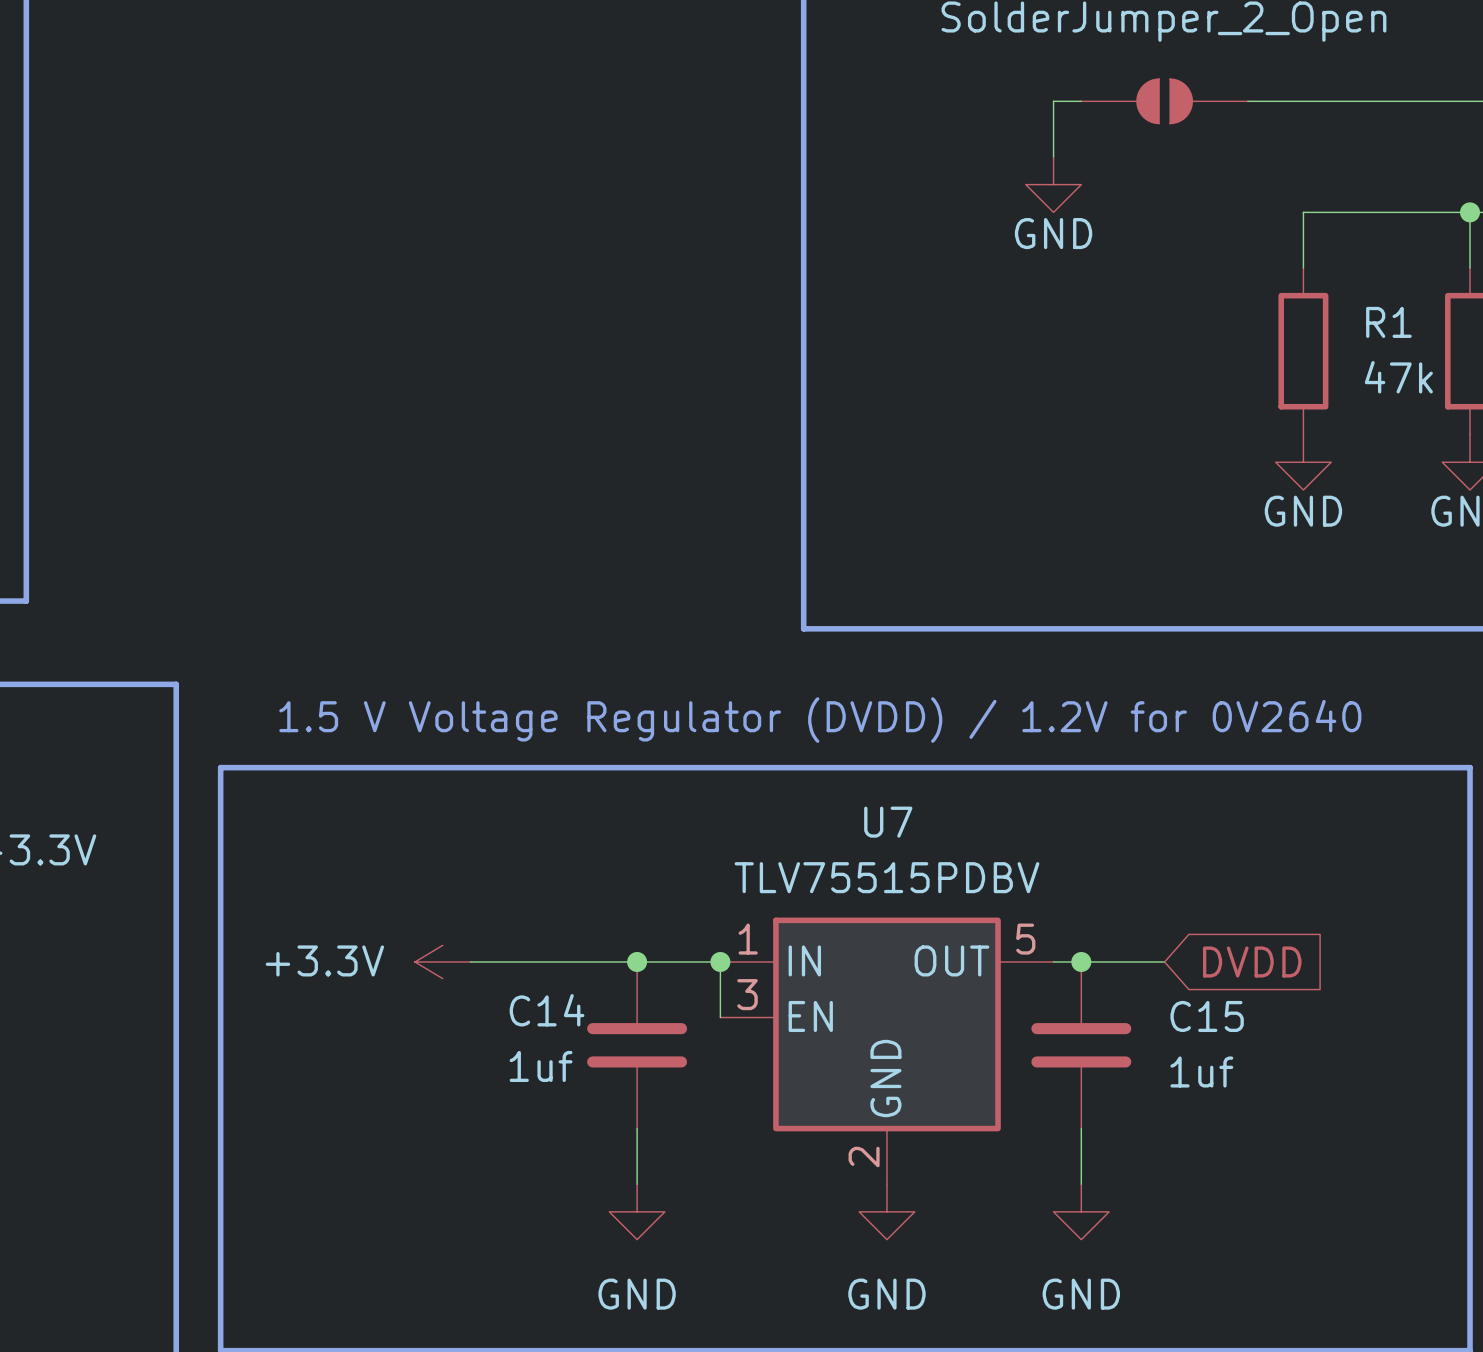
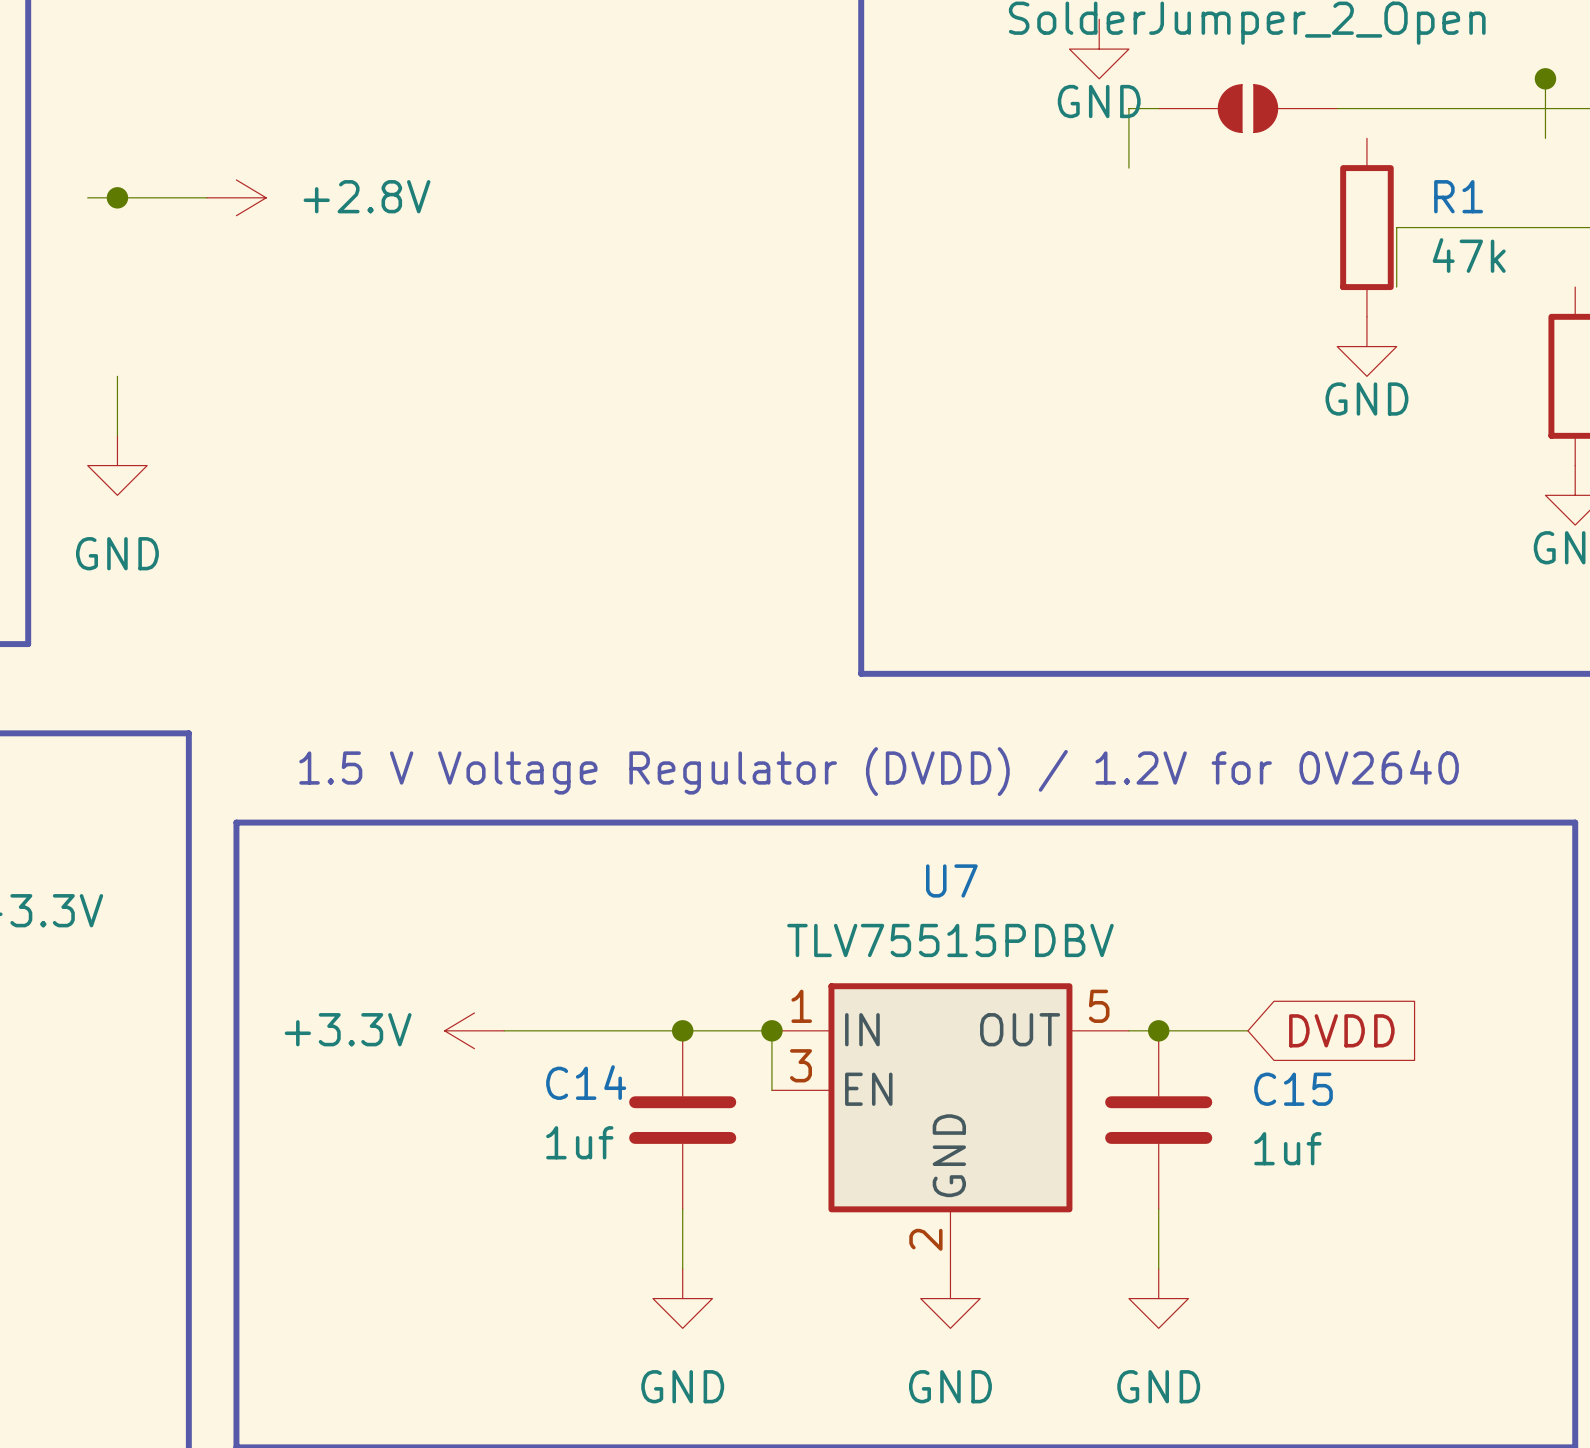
power symbol: none -> GND (1099, 49)
junction: none -> (1545, 78)
wire: none -> (87, 197) (206, 197)
junction: none -> (117, 197)
power symbol: none -> +2.8V (236, 197)
power symbol: GND (1053, 184) -> none
wire: (1470, 212) (1470, 267) -> (1545, 78) (1545, 138)
junction: (1470, 212) -> none
power symbol: none -> GND (1366, 346)
wire: none -> (117, 376) (117, 435)
R1 position: (1303, 351) -> (1366, 227)
power symbol: none -> GND (117, 465)
power symbol: GND (1303, 462) -> none

